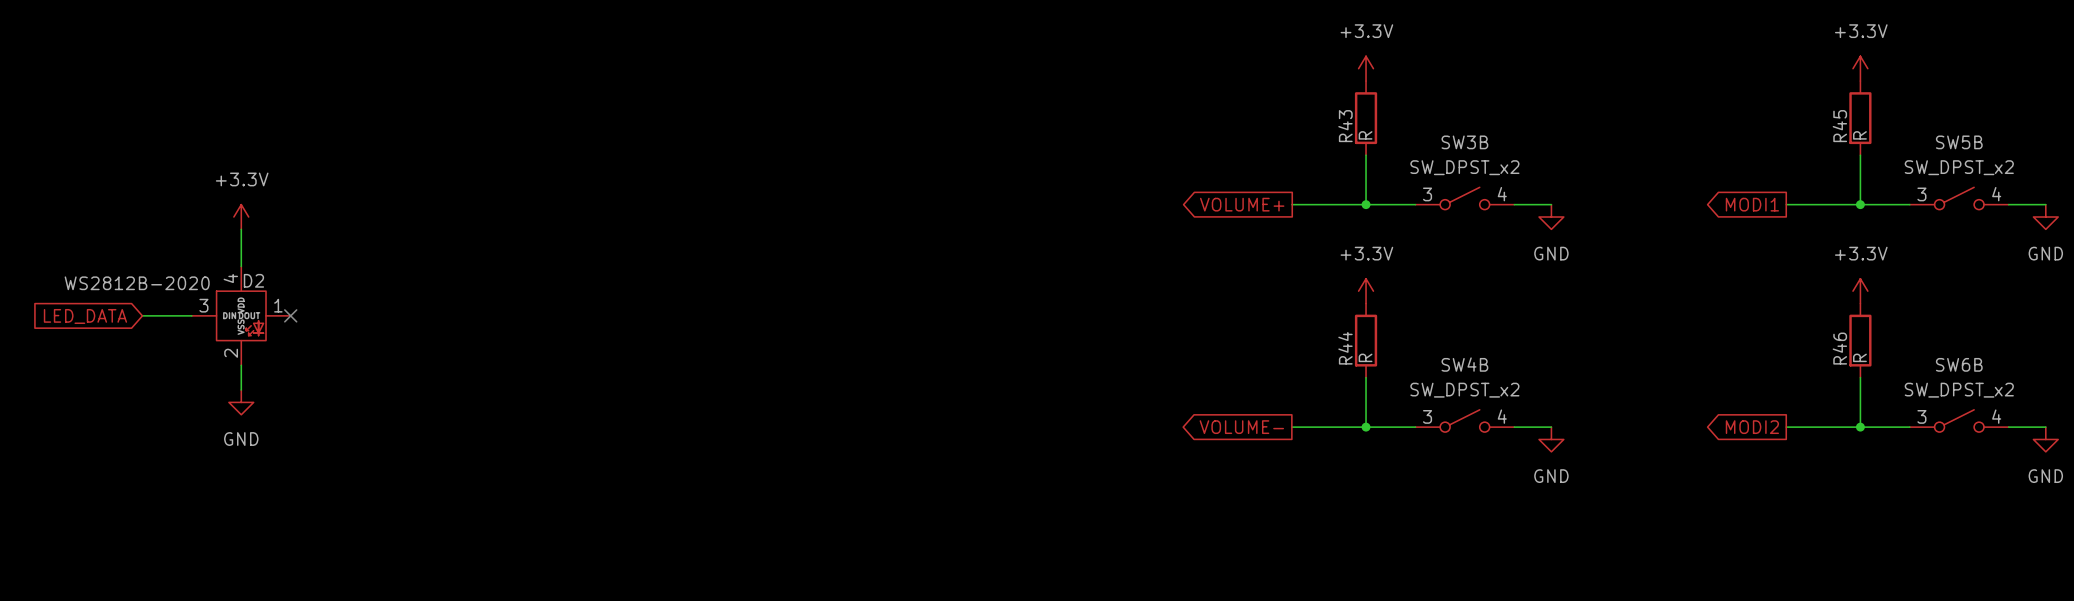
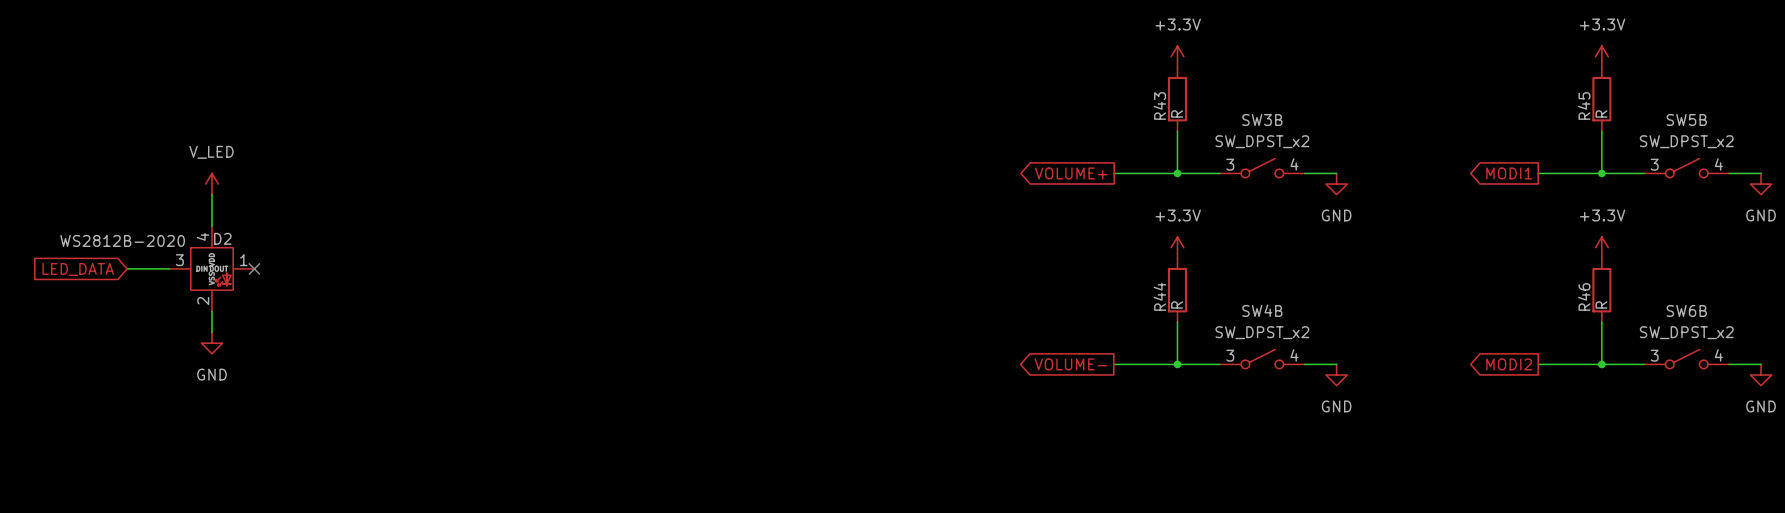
power symbol: +3.3V (241, 217) -> V_LED (211, 184)

